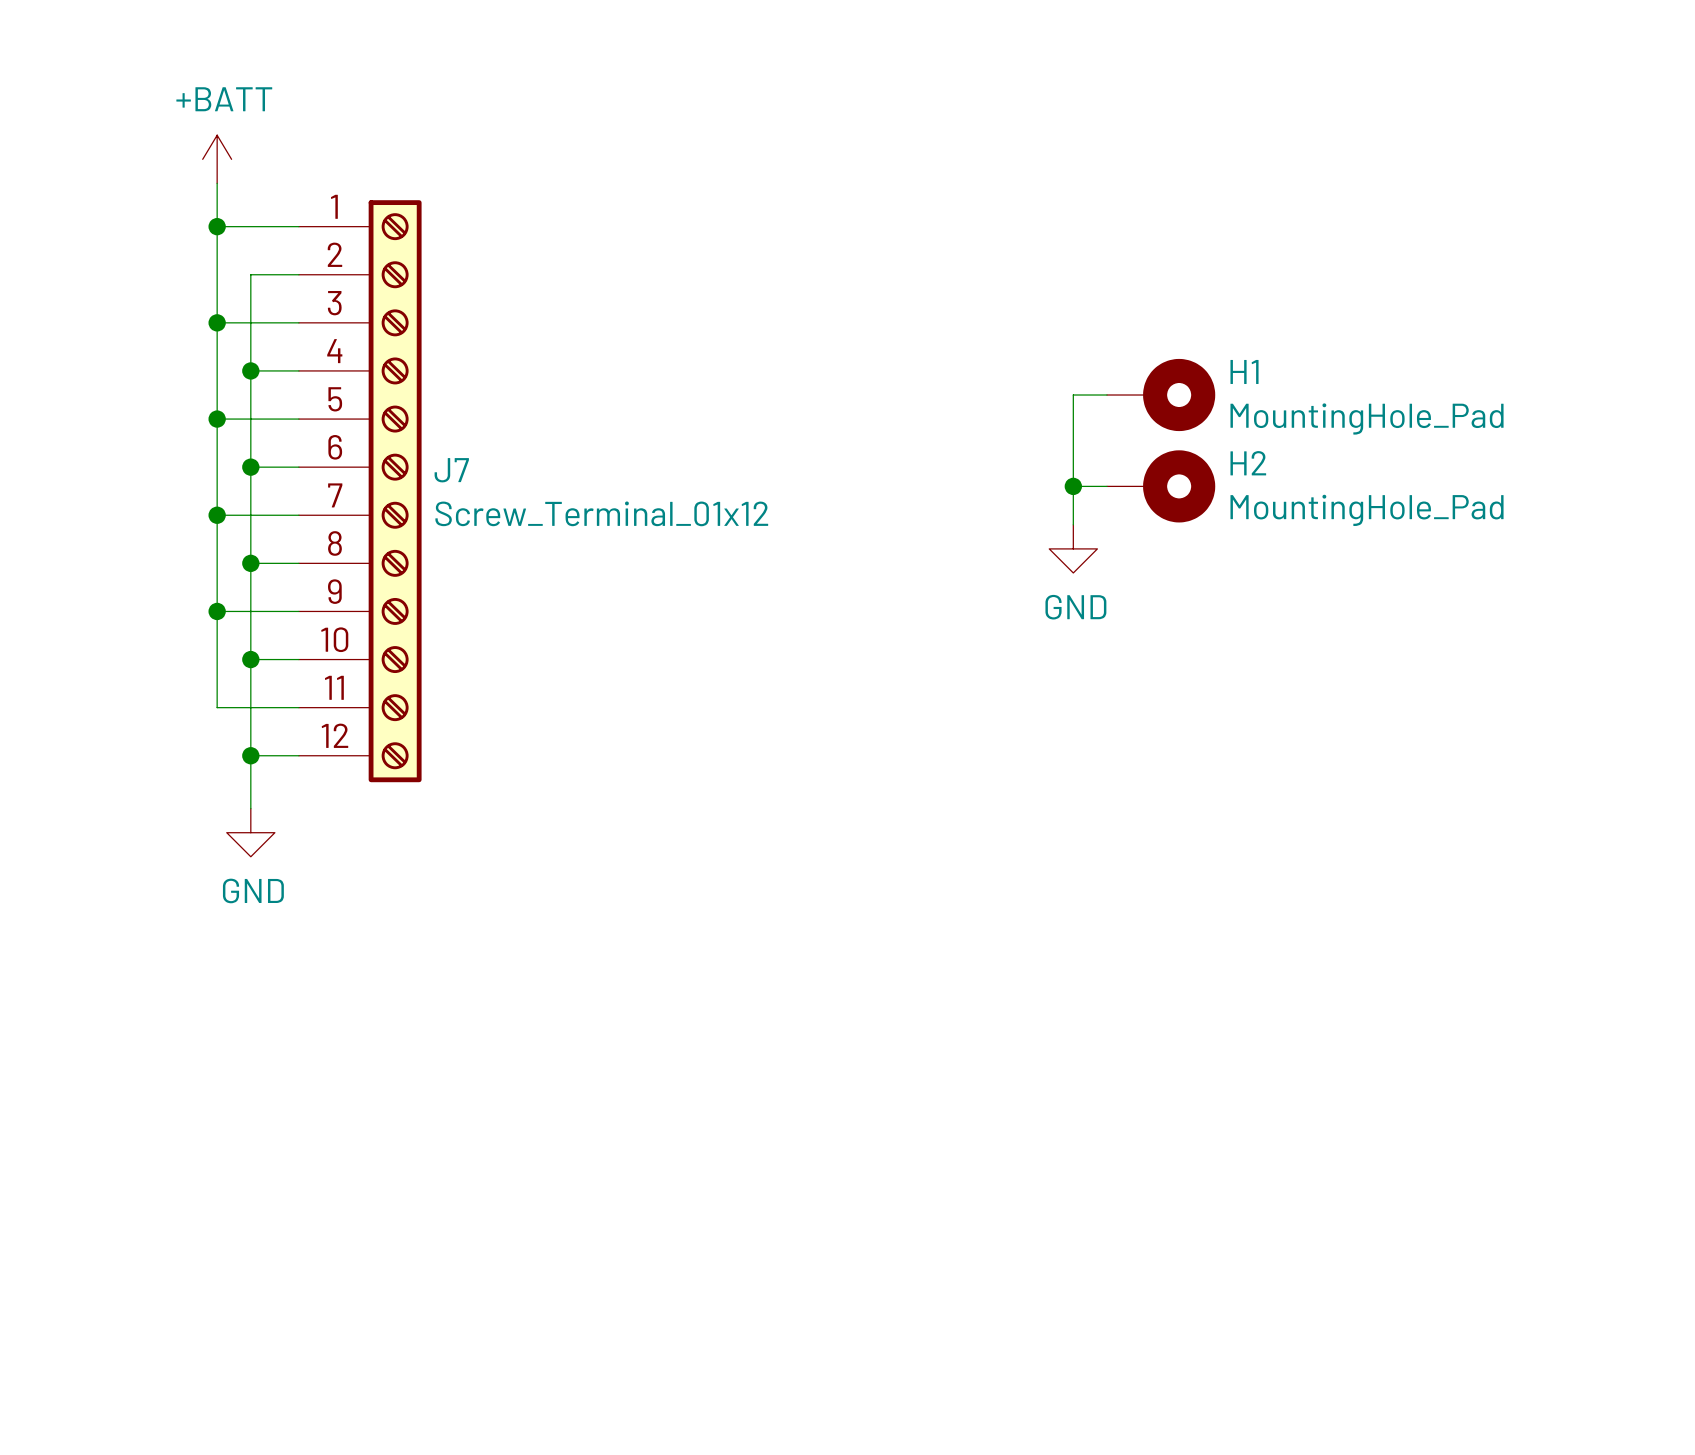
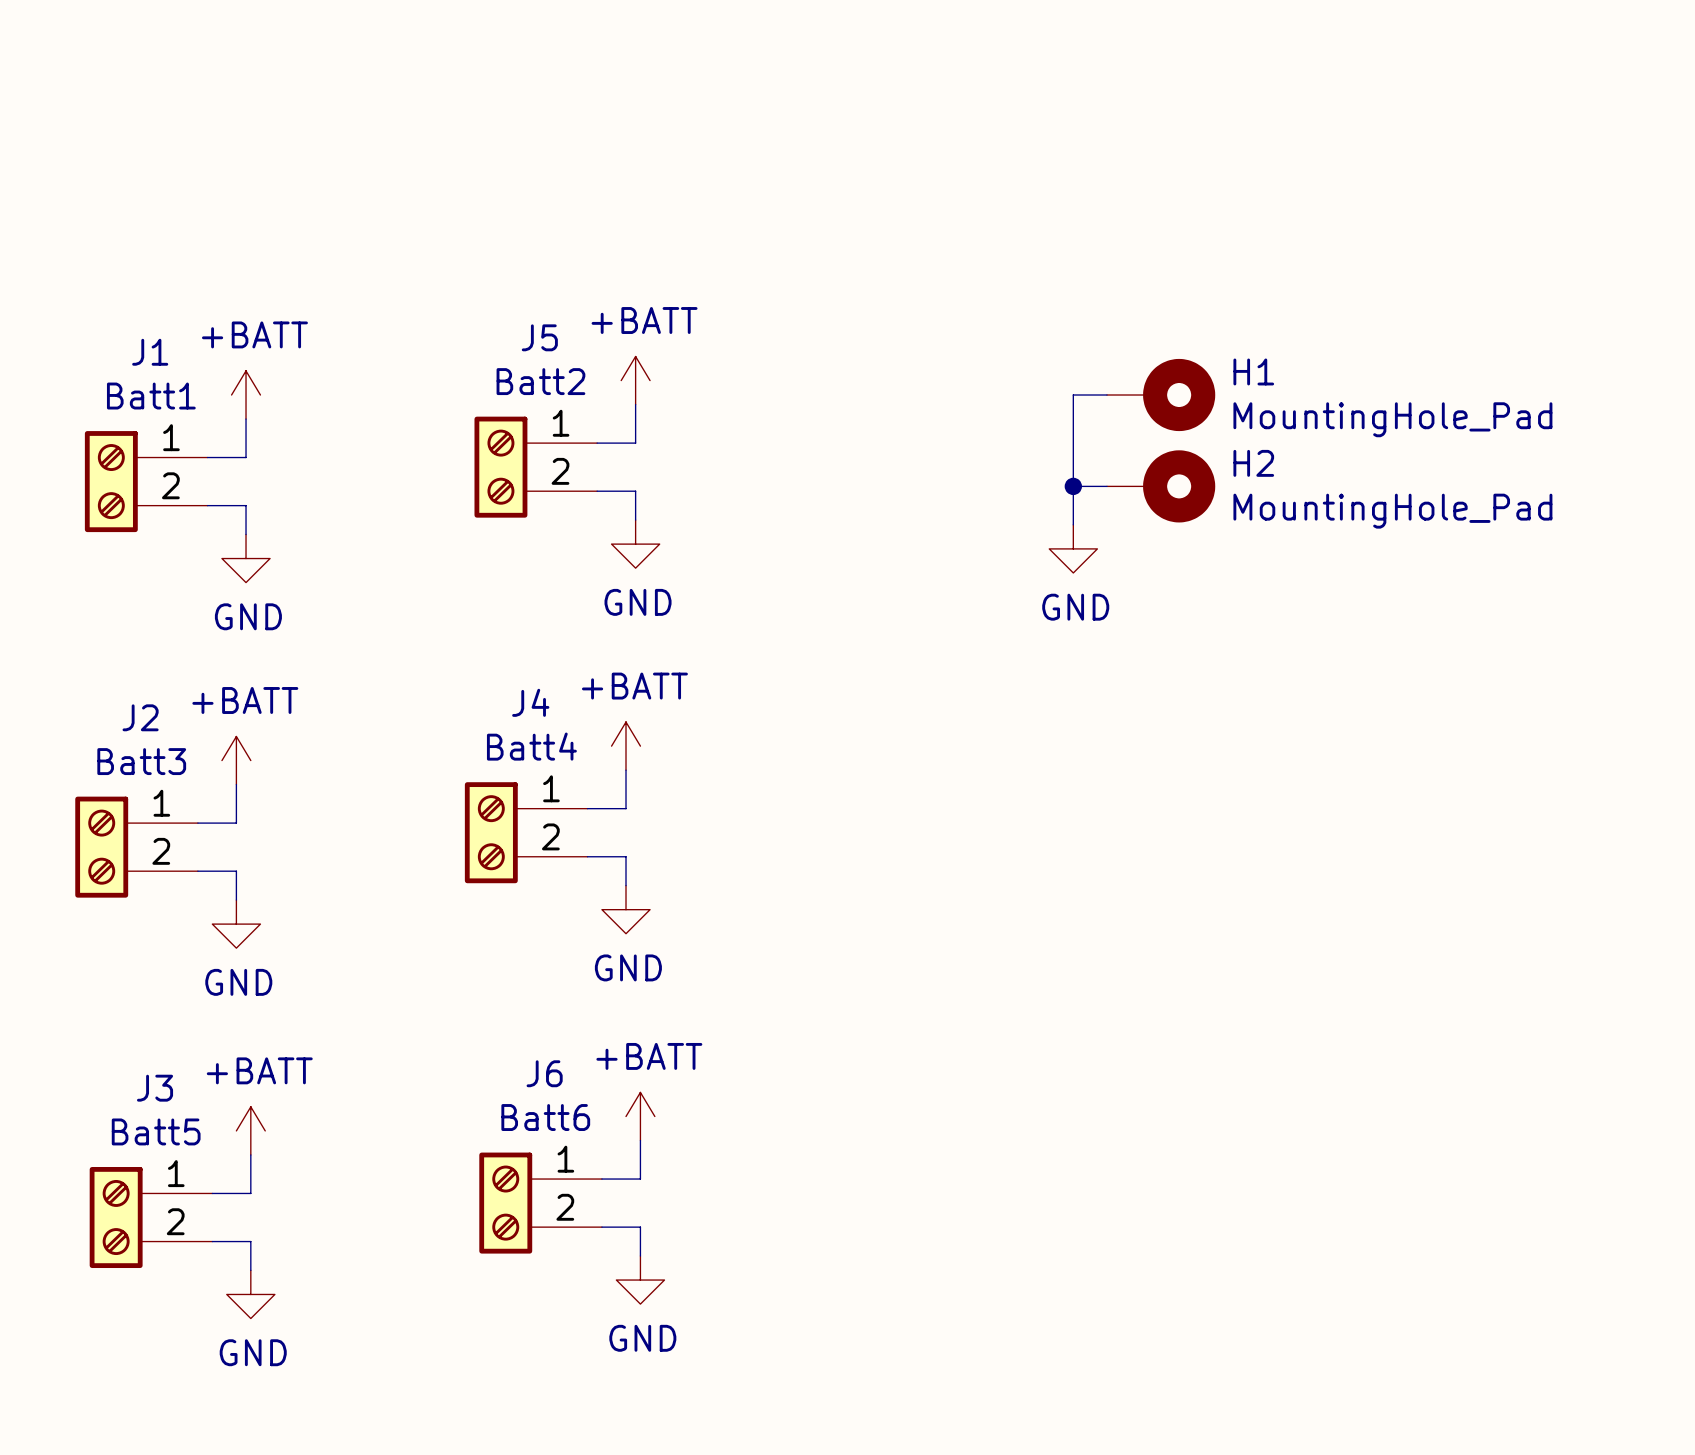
power symbol: +BATT (217, 159) -> none
wire: (217, 183) (217, 707) (298, 707) -> none
wire: (217, 226) (298, 226) -> none
junction: (217, 226) -> none
wire: (298, 274) (250, 274) (250, 808) -> none
wire: (217, 322) (298, 322) -> none
junction: (217, 322) -> none
wire: (250, 370) (298, 370) -> none
junction: (250, 370) -> none
power symbol: none -> +BATT (635, 380)
power symbol: none -> +BATT (246, 395)
wire: none -> (635, 404) (635, 443) (597, 443)
wire: (217, 419) (298, 419) -> none
junction: (217, 419) -> none
wire: none -> (246, 419) (246, 457) (207, 457)
wire: (250, 467) (298, 467) -> none
junction: (250, 467) -> none
J5: none -> Batt2 (535, 467)
J1: none -> Batt1 (146, 481)
J7: Screw_Terminal_01x12 (360, 491) -> none
wire: none -> (597, 491) (635, 491) (635, 520)
wire: none -> (207, 505) (246, 505) (246, 534)
wire: (217, 515) (298, 515) -> none
junction: (217, 515) -> none
power symbol: none -> GND (635, 544)
power symbol: none -> GND (246, 558)
wire: (250, 563) (298, 563) -> none
junction: (250, 563) -> none
wire: (217, 611) (298, 611) -> none
junction: (217, 611) -> none
wire: (250, 659) (298, 659) -> none
junction: (250, 659) -> none
power symbol: none -> +BATT (626, 746)
wire: (250, 755) (298, 755) -> none
junction: (250, 755) -> none
power symbol: none -> +BATT (236, 760)
wire: none -> (626, 770) (626, 808) (587, 808)
wire: none -> (236, 784) (236, 823) (197, 823)
power symbol position: GND (250, 832) -> GND (236, 924)
J4: none -> Batt4 (526, 832)
J2: none -> Batt3 (136, 847)
wire: none -> (587, 856) (626, 856) (626, 885)
wire: none -> (197, 871) (236, 871) (236, 900)
power symbol: none -> GND (626, 909)
power symbol: none -> +BATT (640, 1116)
power symbol: none -> +BATT (250, 1130)
wire: none -> (640, 1140) (640, 1179) (601, 1179)
wire: none -> (250, 1154) (250, 1193) (212, 1193)
J6: none -> Batt6 (540, 1203)
J3: none -> Batt5 (151, 1217)
wire: none -> (601, 1227) (640, 1227) (640, 1255)
wire: none -> (212, 1241) (250, 1241) (250, 1270)
power symbol: none -> GND (640, 1280)
power symbol: none -> GND (250, 1294)

